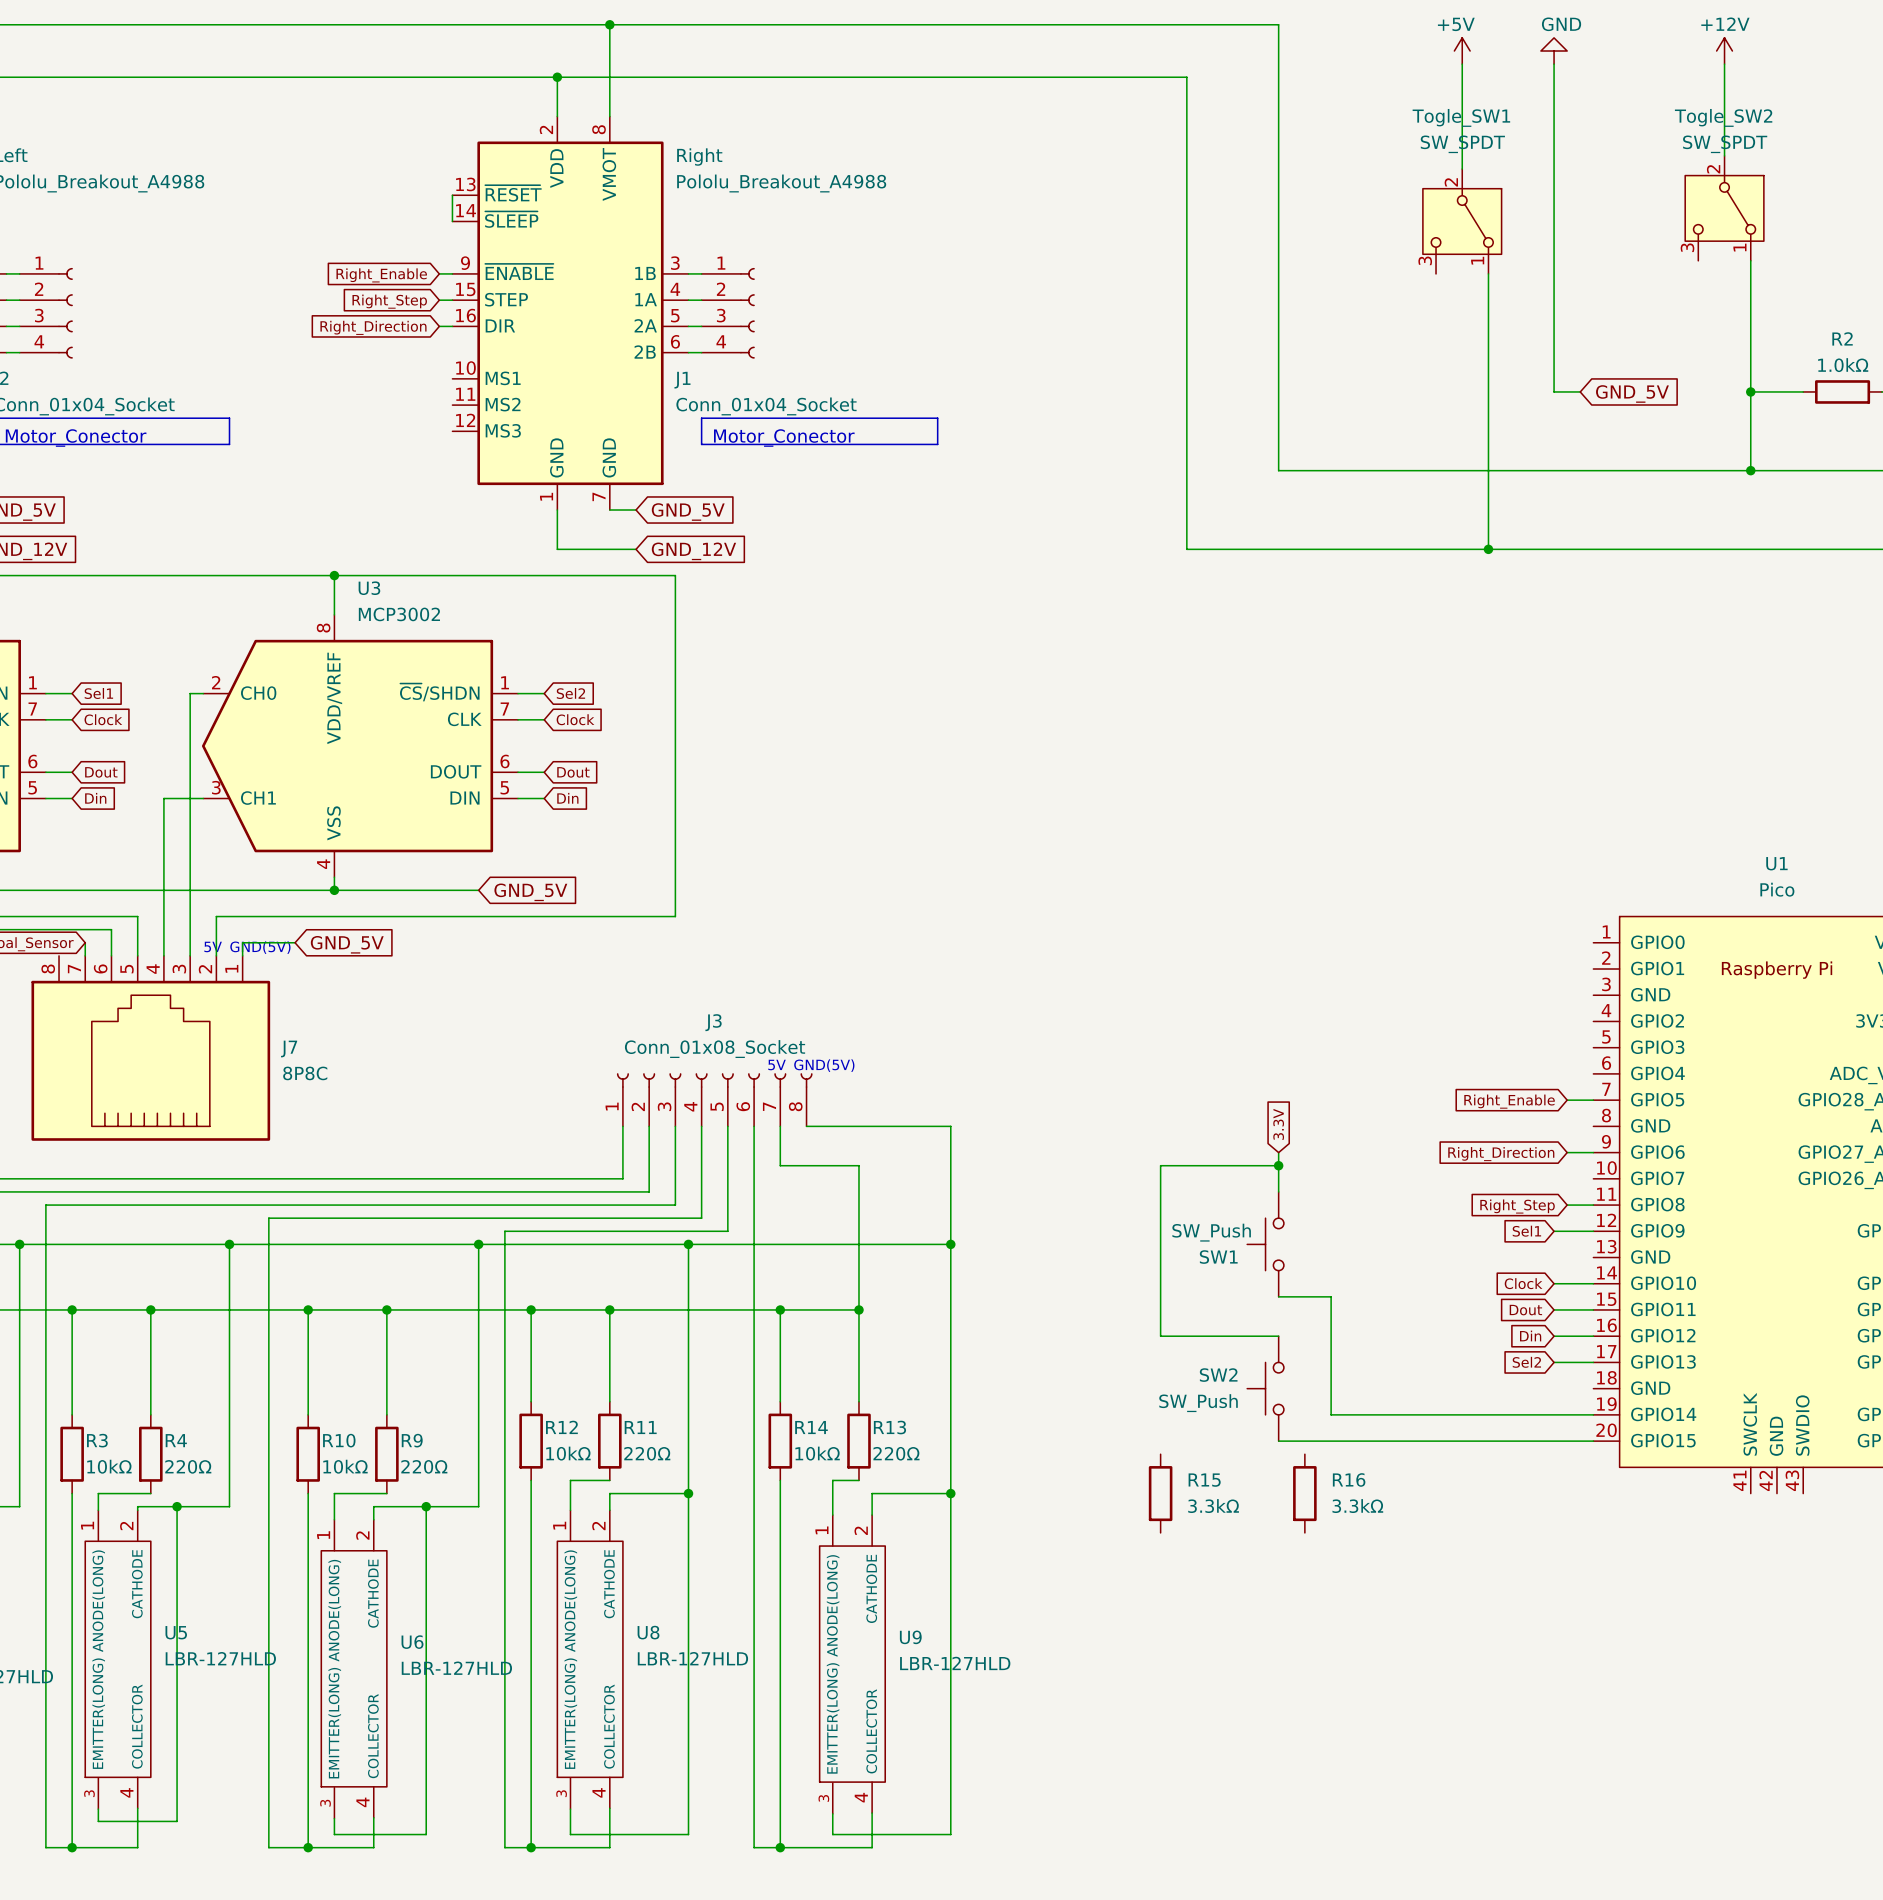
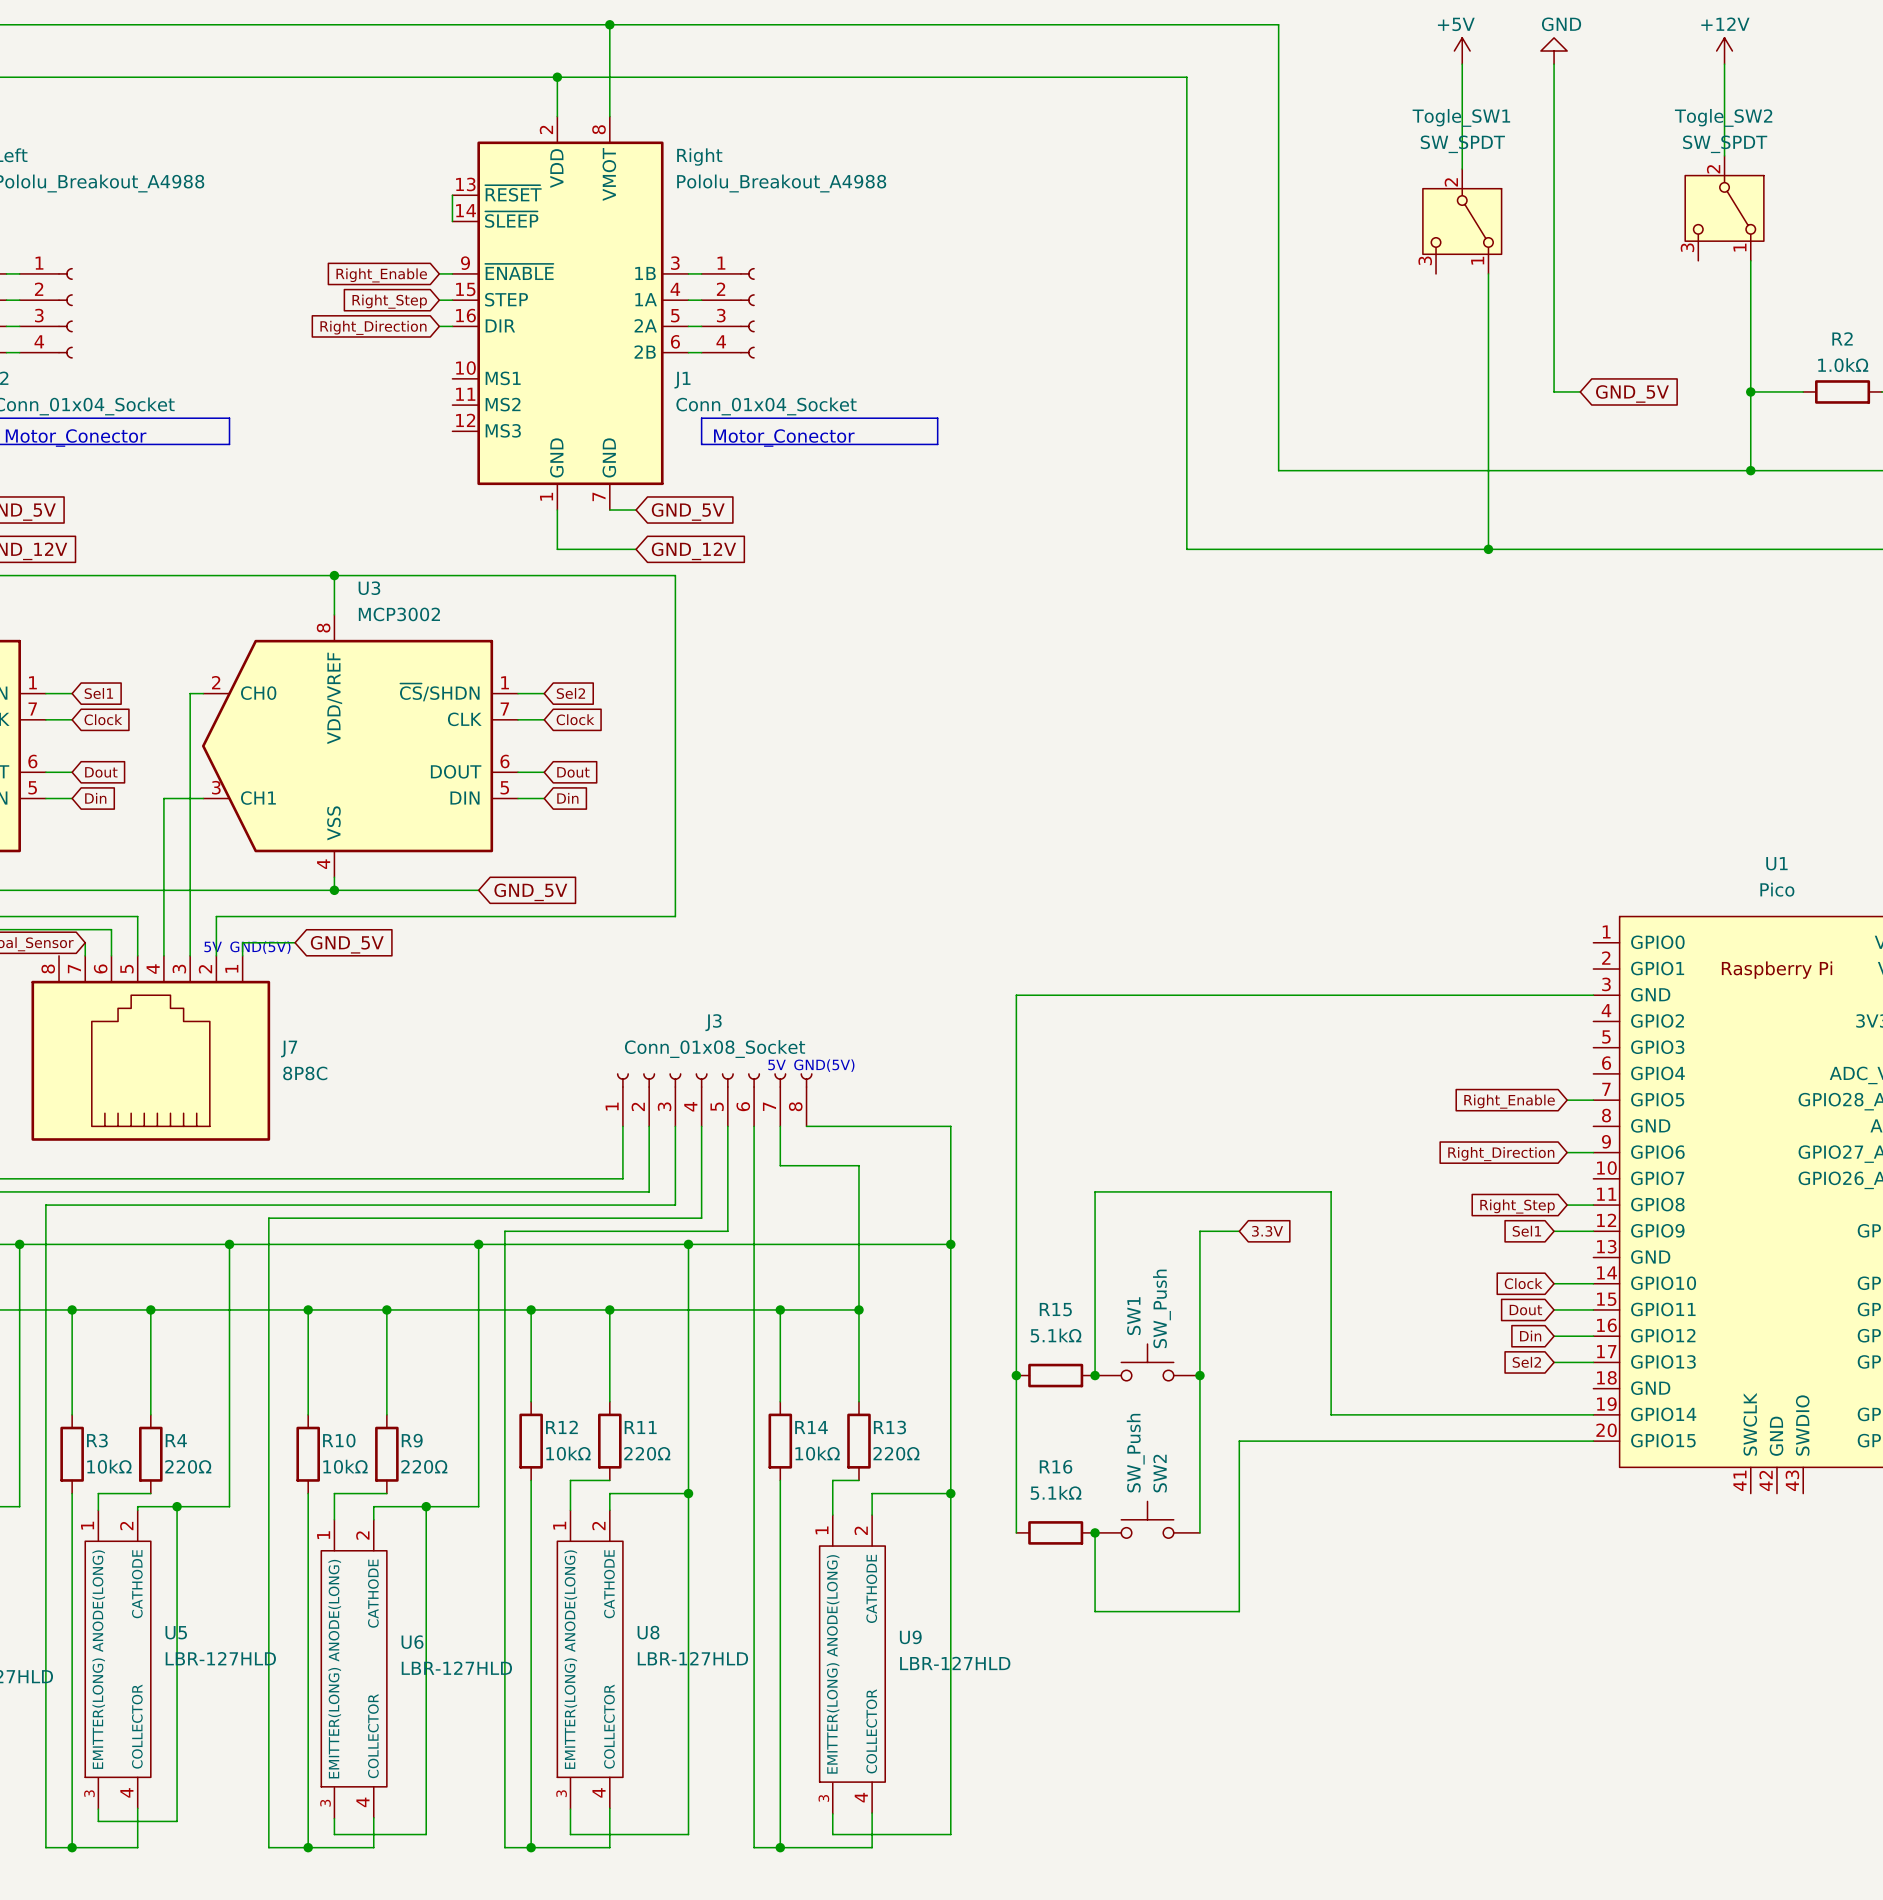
wire: none -> (1593, 995) (1016, 995) (1016, 1532)
global label rotation: 0° (1278, 1124) -> 90° clockwise (1267, 1231)
global label position: 3.3V (1278, 1124) -> 3.3V (1267, 1231)
wire: (1278, 1152) (1278, 1191) -> none
wire: (1278, 1165) (1160, 1165) (1160, 1336) (1278, 1336) -> none
junction: (1278, 1165) -> none
wire: none -> (1239, 1231) (1199, 1231) (1199, 1532)
SW1 rotation: 0° (1265, 1244) -> 90° clockwise (1147, 1362)
SW1 position: (1265, 1244) -> (1147, 1362)
wire: (1278, 1296) (1331, 1296) -> (1095, 1375) (1095, 1191) (1331, 1191) (1331, 1296)
junction: none -> (1016, 1375)
junction: none -> (1095, 1375)
junction: none -> (1199, 1375)
SW2 rotation: 0° (1265, 1388) -> 90° clockwise (1147, 1519)
SW2 position: (1265, 1388) -> (1147, 1519)
wire: none -> (1278, 1441) (1239, 1441) (1239, 1611) (1095, 1611) (1095, 1532)
R16 name position: R16 (1349, 1479) -> R16 (1056, 1466)
R15 name position: R15 (1204, 1480) -> R15 (1055, 1309)
R15 rotation: 0° (1160, 1493) -> 90° clockwise (1055, 1375)
R15 position: (1160, 1493) -> (1055, 1375)
R16 rotation: 0° (1304, 1493) -> 90° clockwise (1055, 1532)
R16 position: (1304, 1493) -> (1055, 1532)
R15 value: 3.3kΩ (1213, 1506) -> 5.1kΩ (1056, 1335)
R16 value: 3.3kΩ (1357, 1506) -> 5.1kΩ (1056, 1492)
junction: none -> (1095, 1532)

